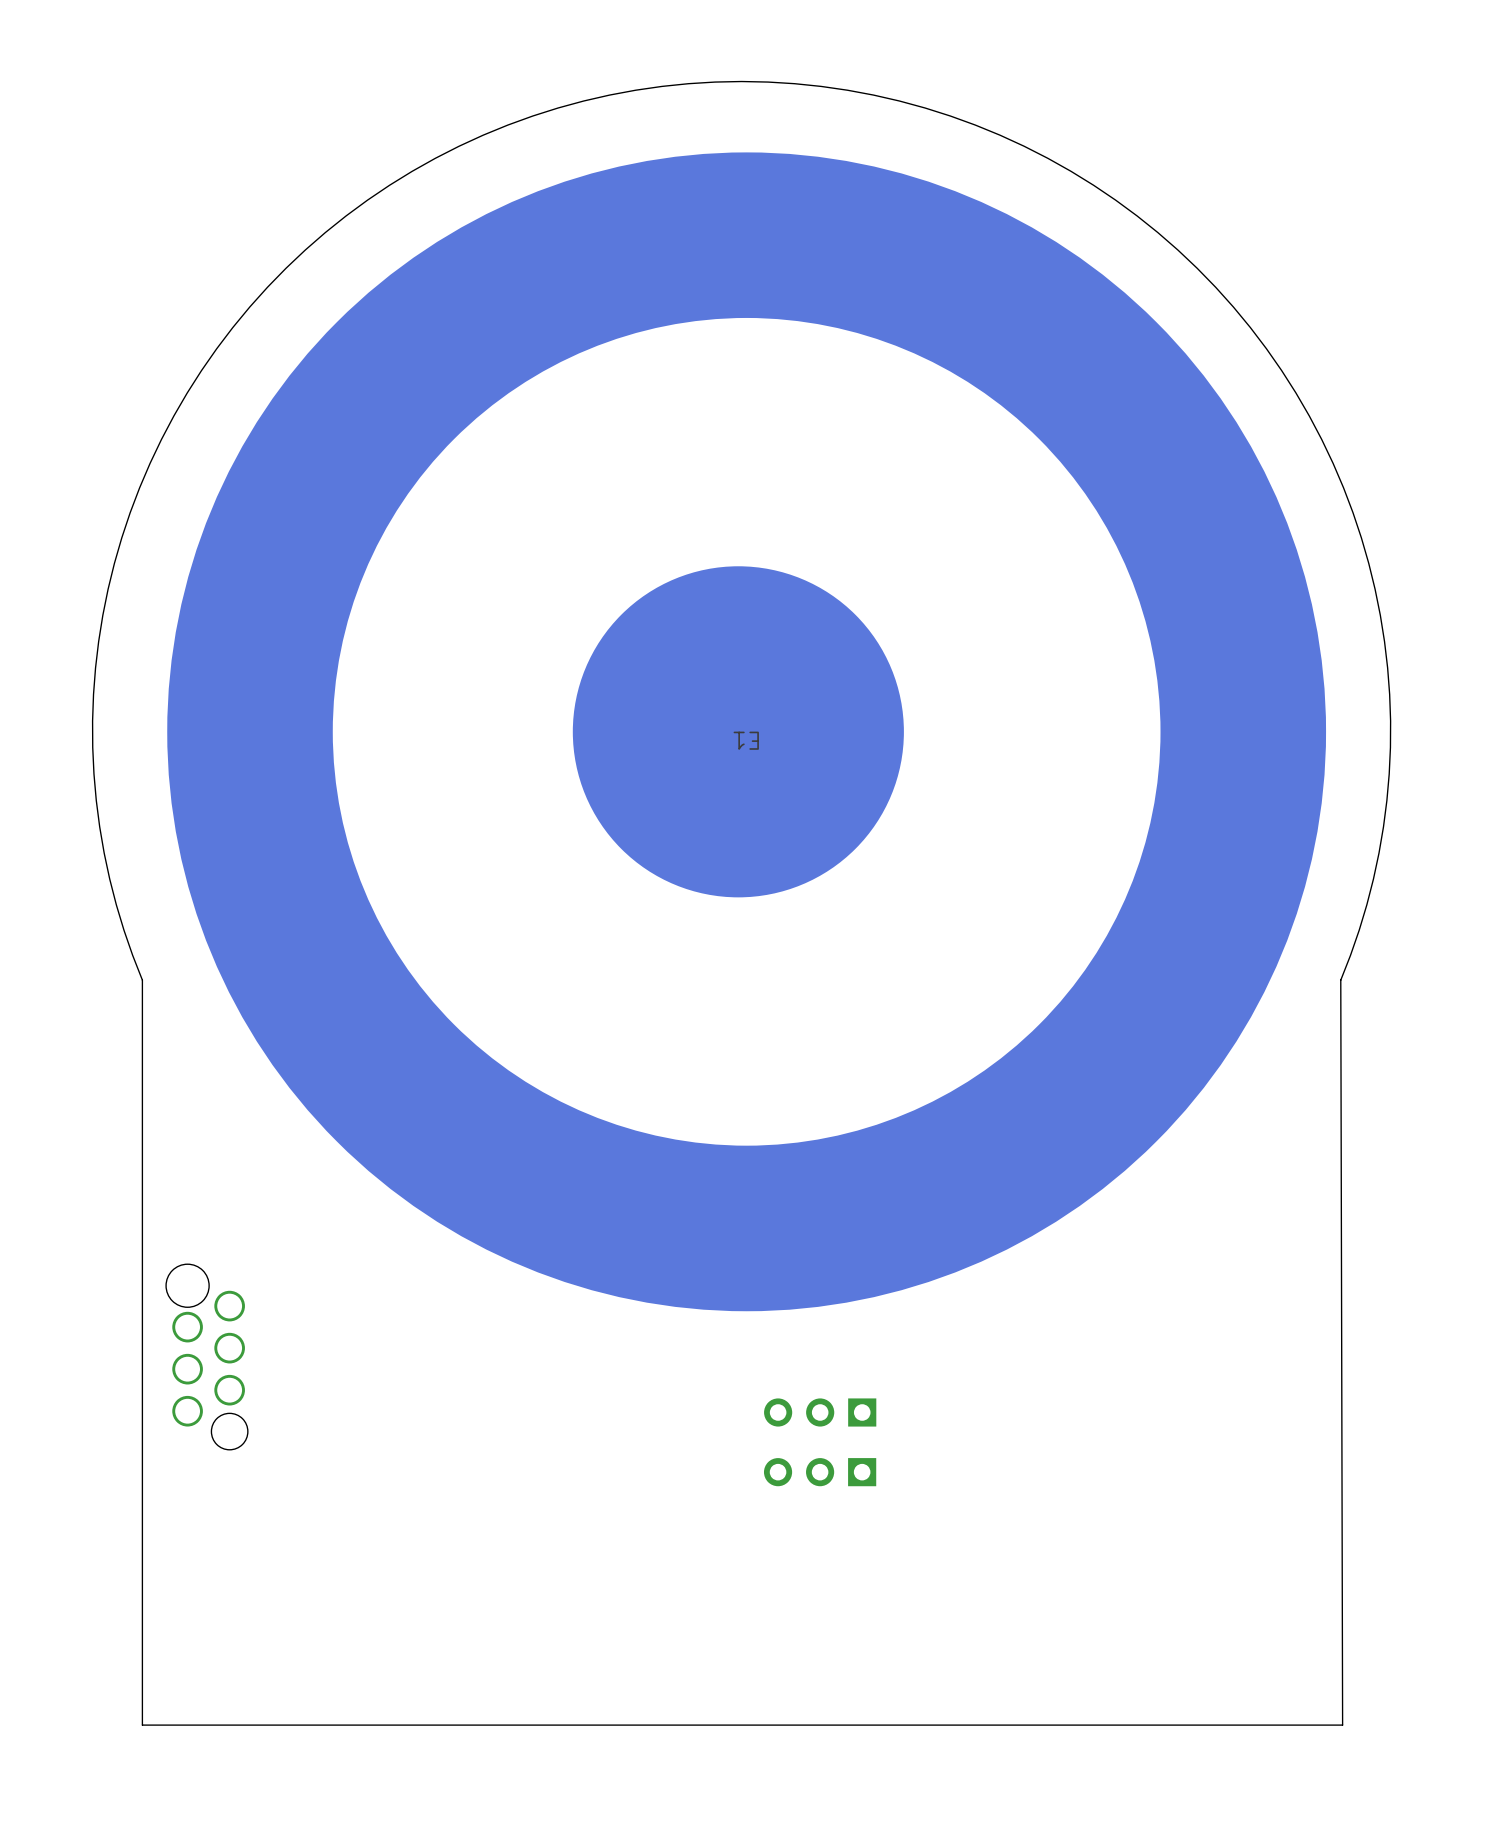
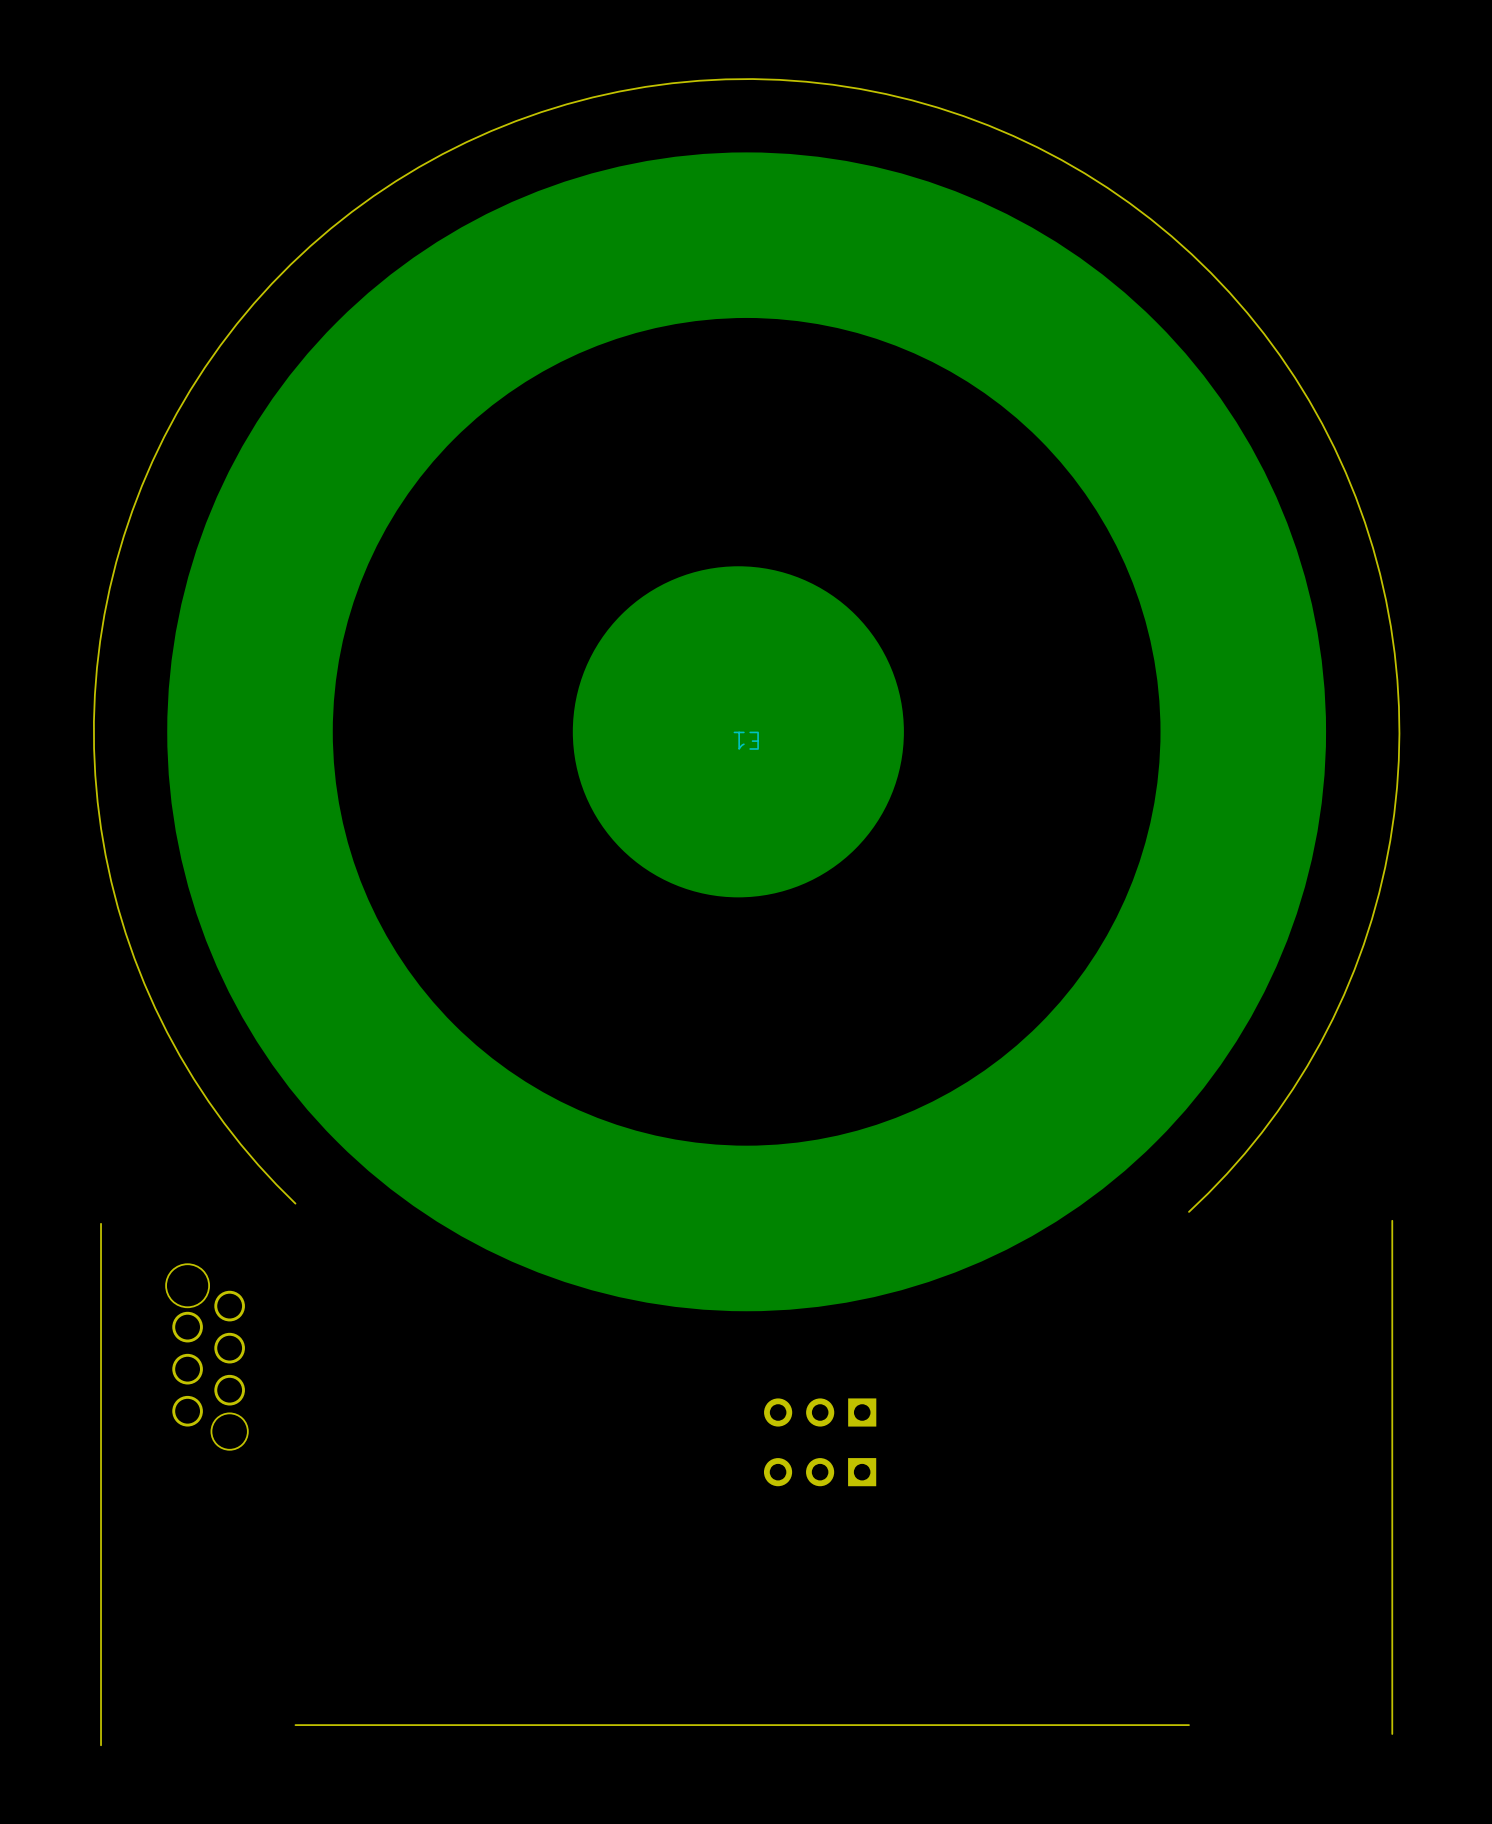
board edge: none -> (295, 1203) (258, 1164) (224, 1123) (179, 1055) (155, 1008) (134, 958) (111, 881) (97, 802) (94, 748) (94, 694) (100, 641) (109, 588) (123, 536) (141, 485) (164, 437) (190, 390) (220, 345) (253, 303) (290, 264) (330, 228) (395, 181) (442, 154) (490, 131) (566, 104) (619, 91) (672, 83) (752, 79) (806, 81) (859, 88) (912, 100) (963, 116) (1013, 136) (1061, 159) (1129, 203) (1171, 236) (1211, 273) (1264, 333) (1295, 377) (1322, 423) (1355, 497) (1380, 574) (1390, 626) (1397, 680) (1399, 733) (1397, 787) (1385, 867) (1371, 919) (1354, 969) (1332, 1019) (1307, 1066) (1261, 1132) (1226, 1173) (1188, 1211)
board edge: none -> (1392, 1220) (1392, 1733)
board edge: none -> (101, 1223) (101, 1745)
board edge: (1188, 1725) (1342, 1725) (1340, 980) (1359, 930) (1373, 879) (1383, 826) (1390, 747) (1389, 694) (1384, 641) (1368, 563) (1352, 512) (1333, 463) (1309, 415) (1281, 370) (1250, 327) (1215, 287) (1177, 249) (1137, 215) (1093, 185) (1047, 158) (1000, 135) (950, 116) (899, 101) (847, 90) (794, 83) (741, 81) (688, 83) (635, 90) (583, 101) (532, 116) (483, 135) (435, 158) (389, 185) (346, 215) (305, 249) (267, 287) (232, 327) (201, 370) (173, 415) (150, 463) (130, 512) (114, 563) (98, 641) (93, 694) (92, 747) (99, 826) (109, 879) (123, 930) (142, 980) (142, 1725) (295, 1725) -> none

